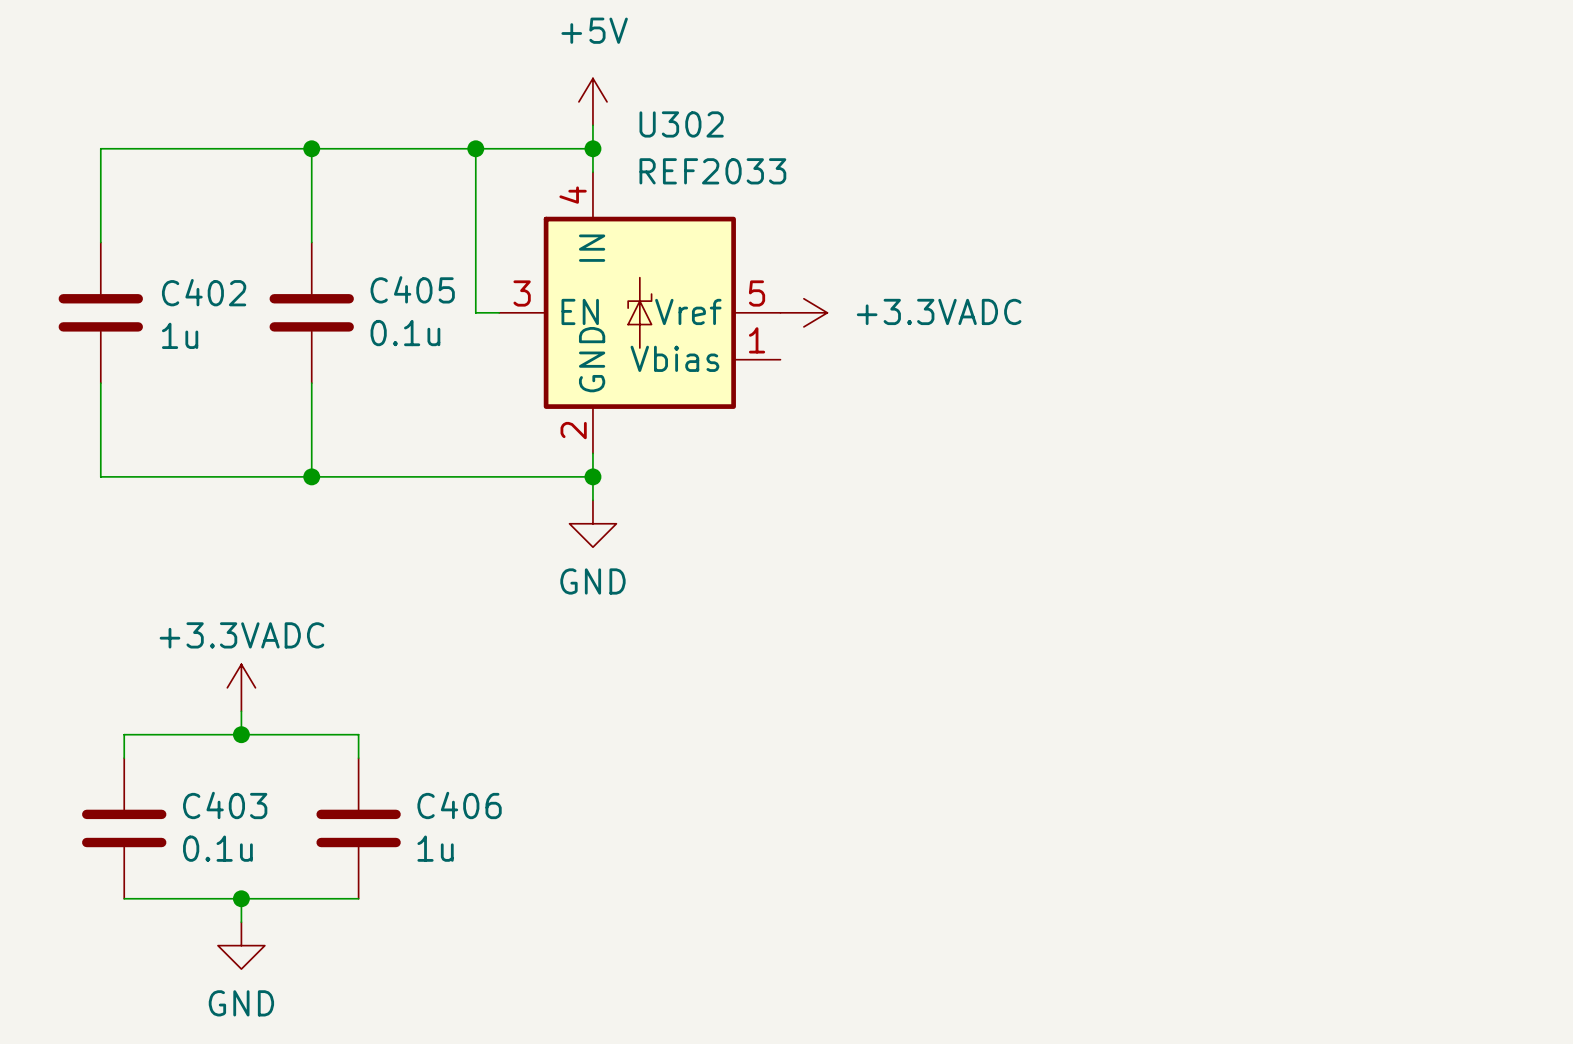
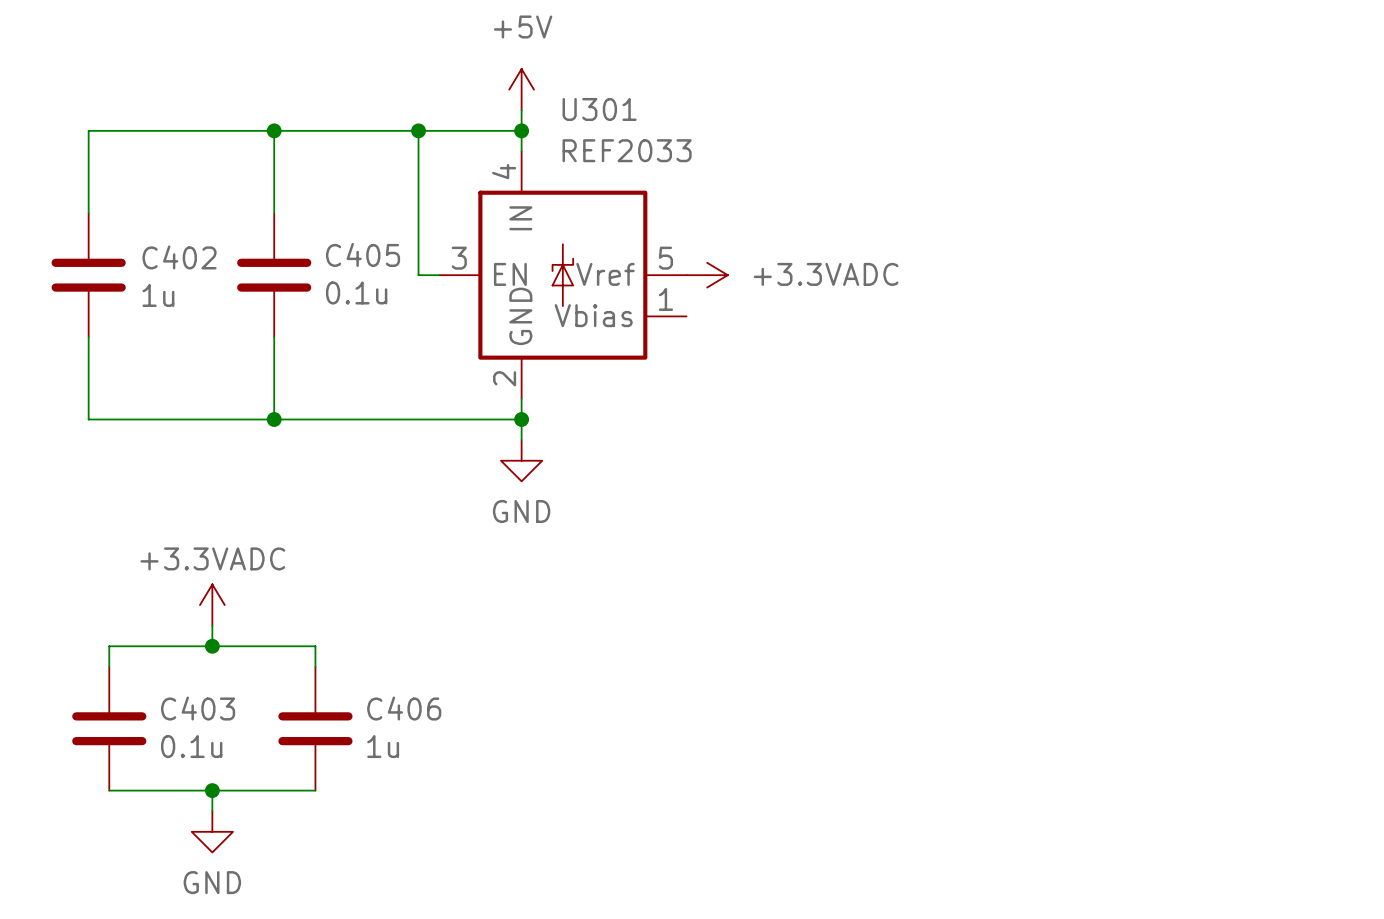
U302 name: U302 (681, 124) -> U301 (599, 109)

